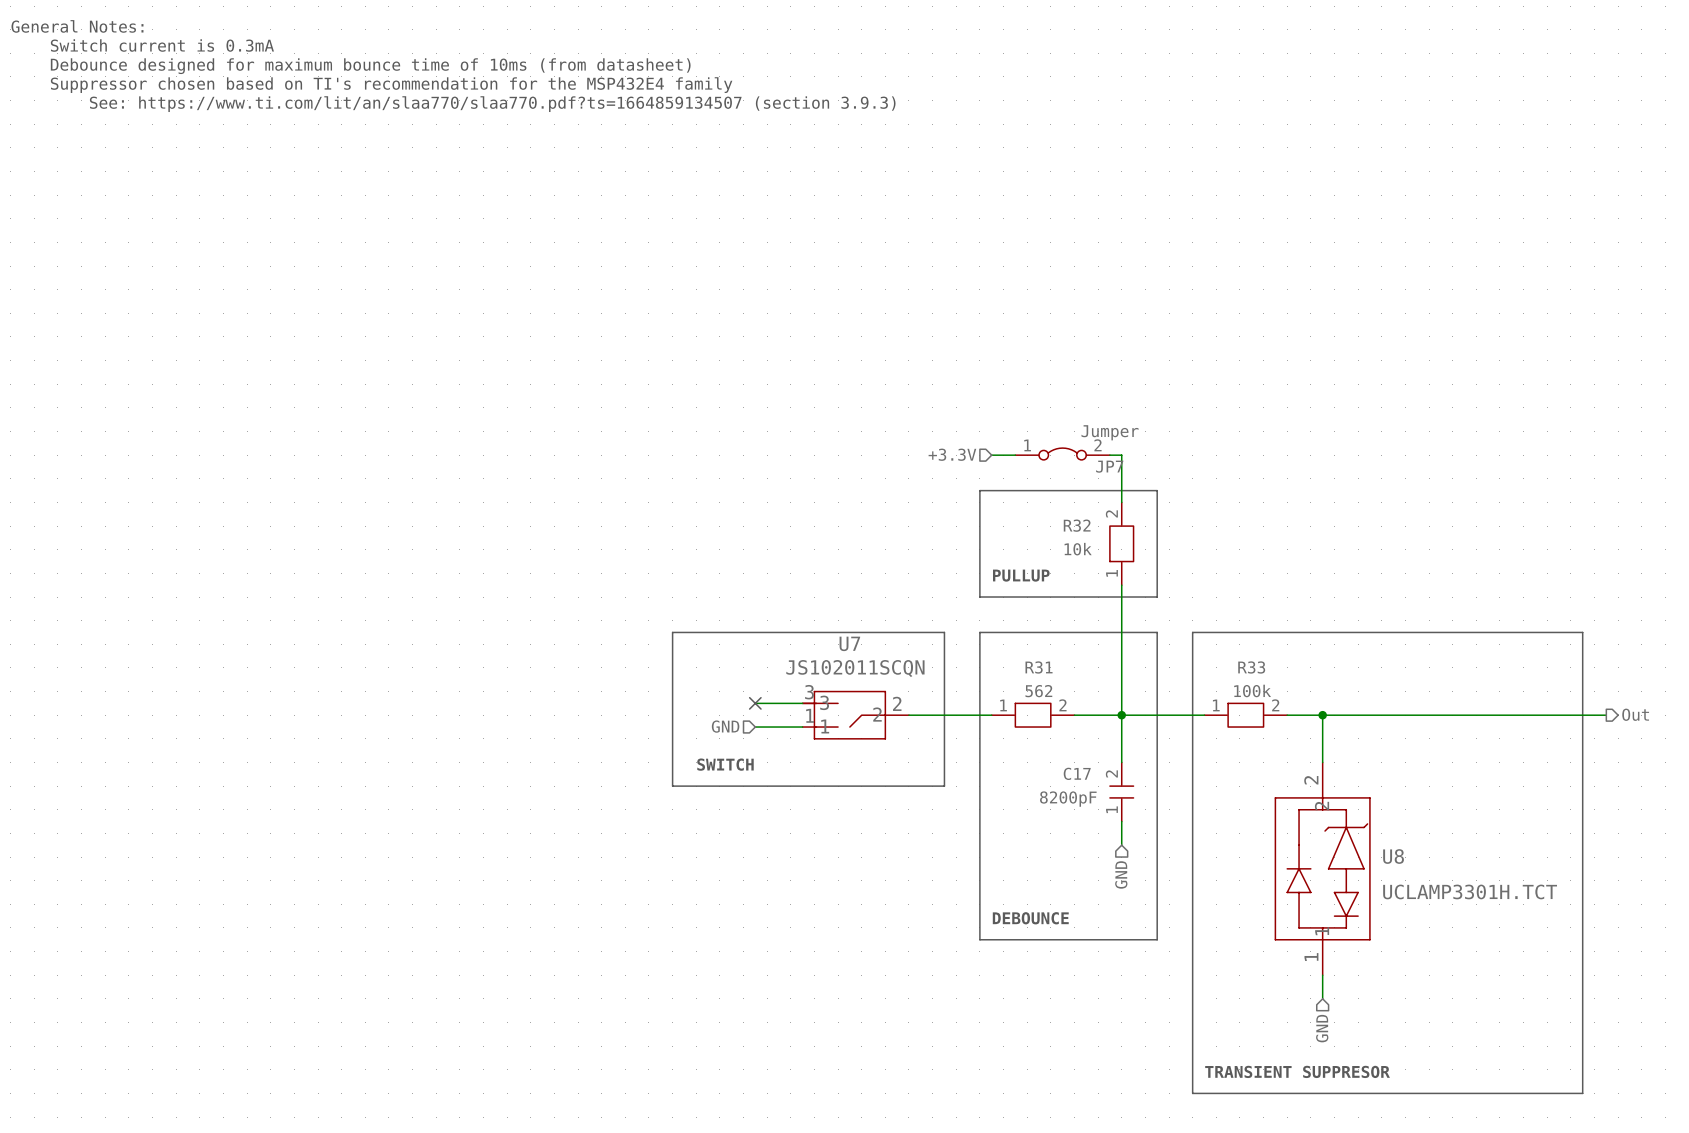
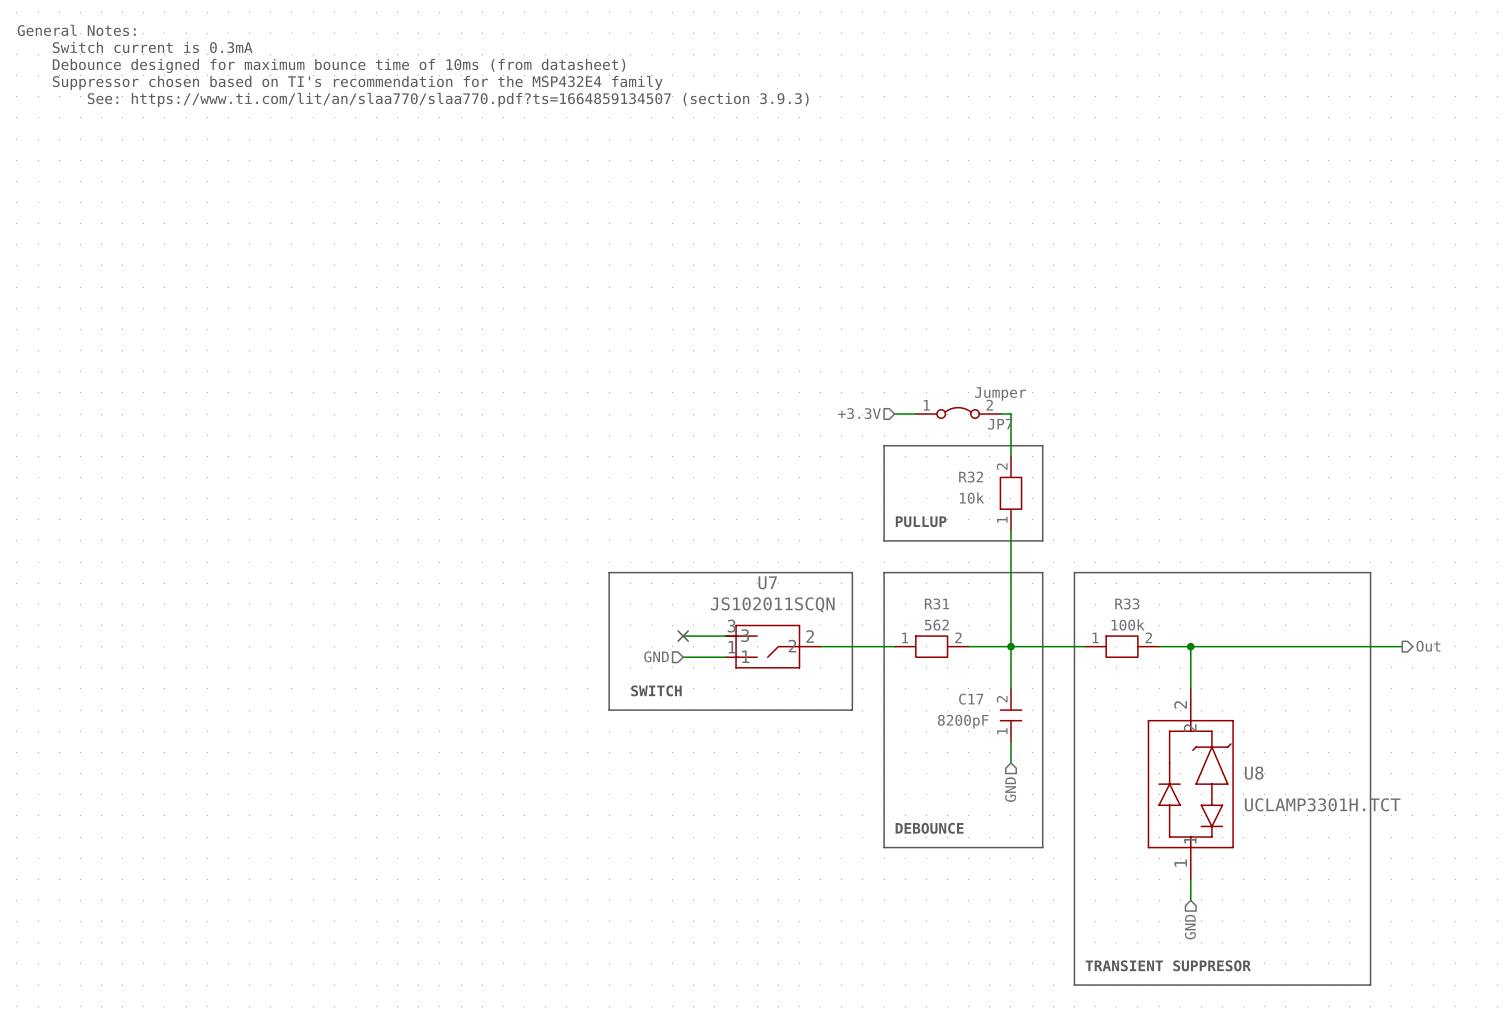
line: (1523, 632) (1582, 632) (1582, 1093) (1523, 1093) -> (1370, 572) (1370, 985)
hierarchical label position: Out (1635, 714) -> Out (1428, 646)
wire: (1559, 715) (1606, 715) -> none

